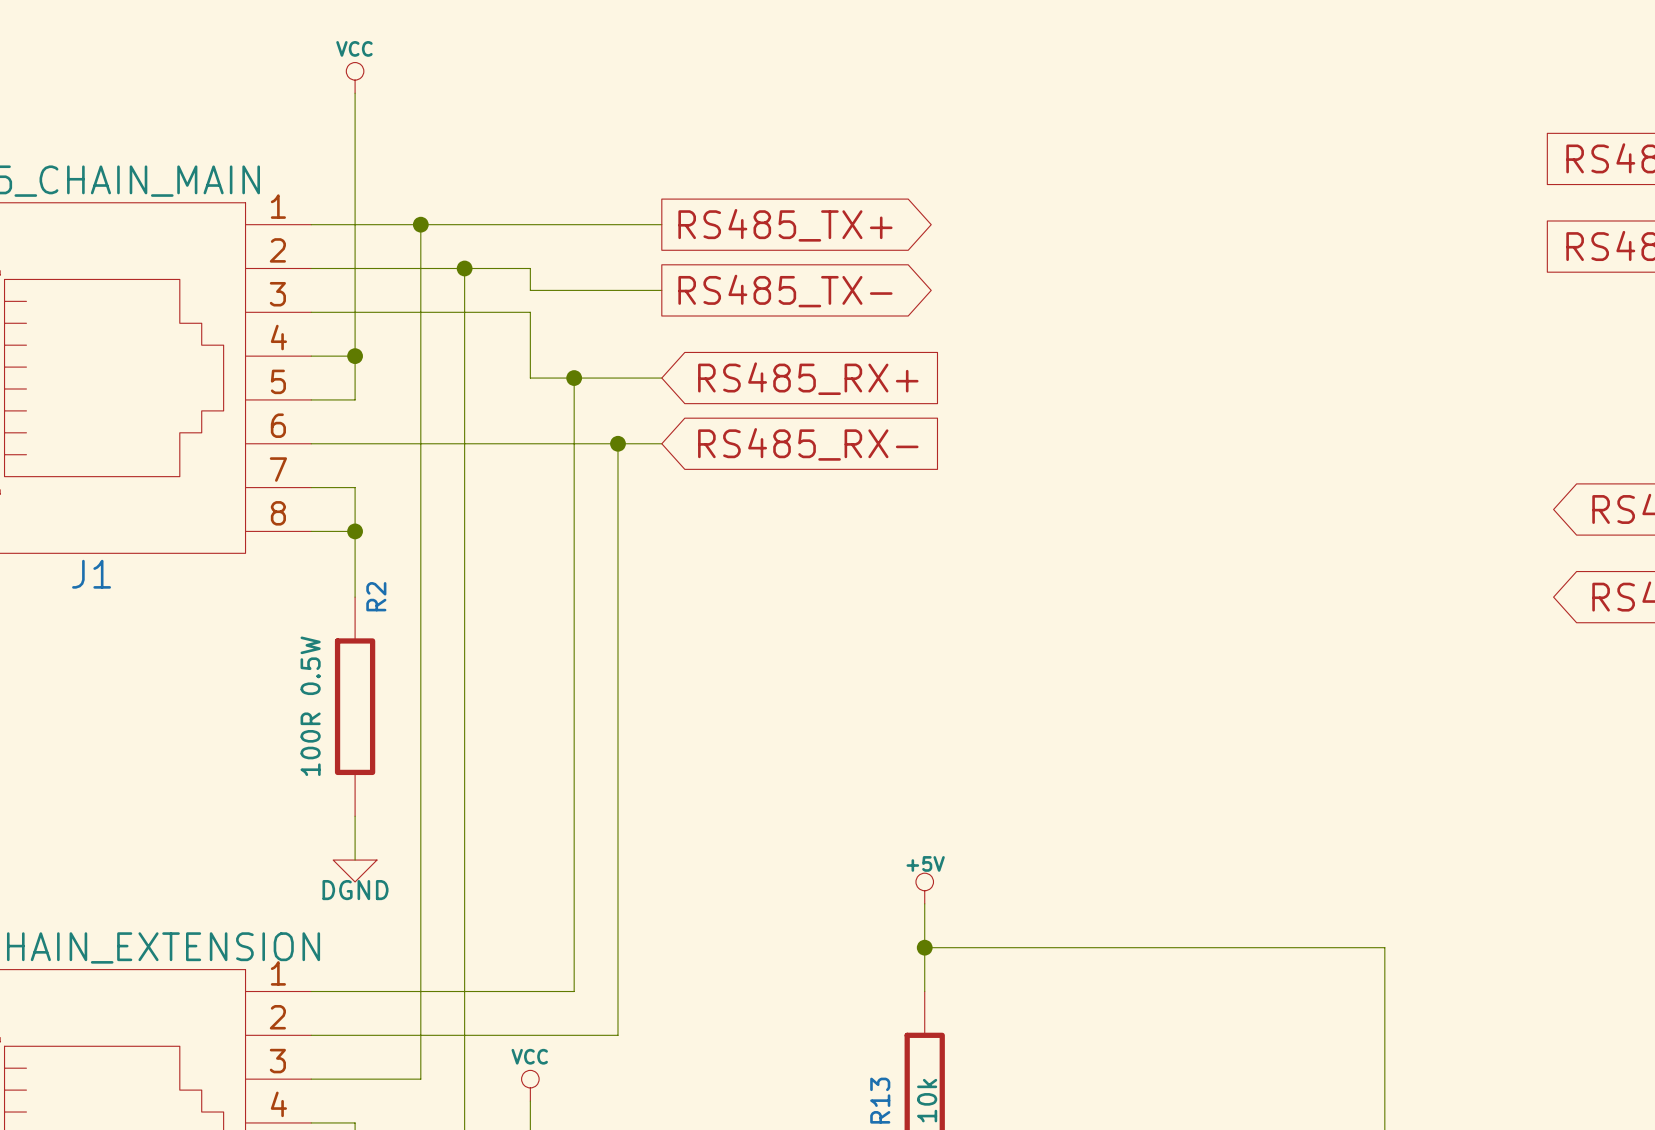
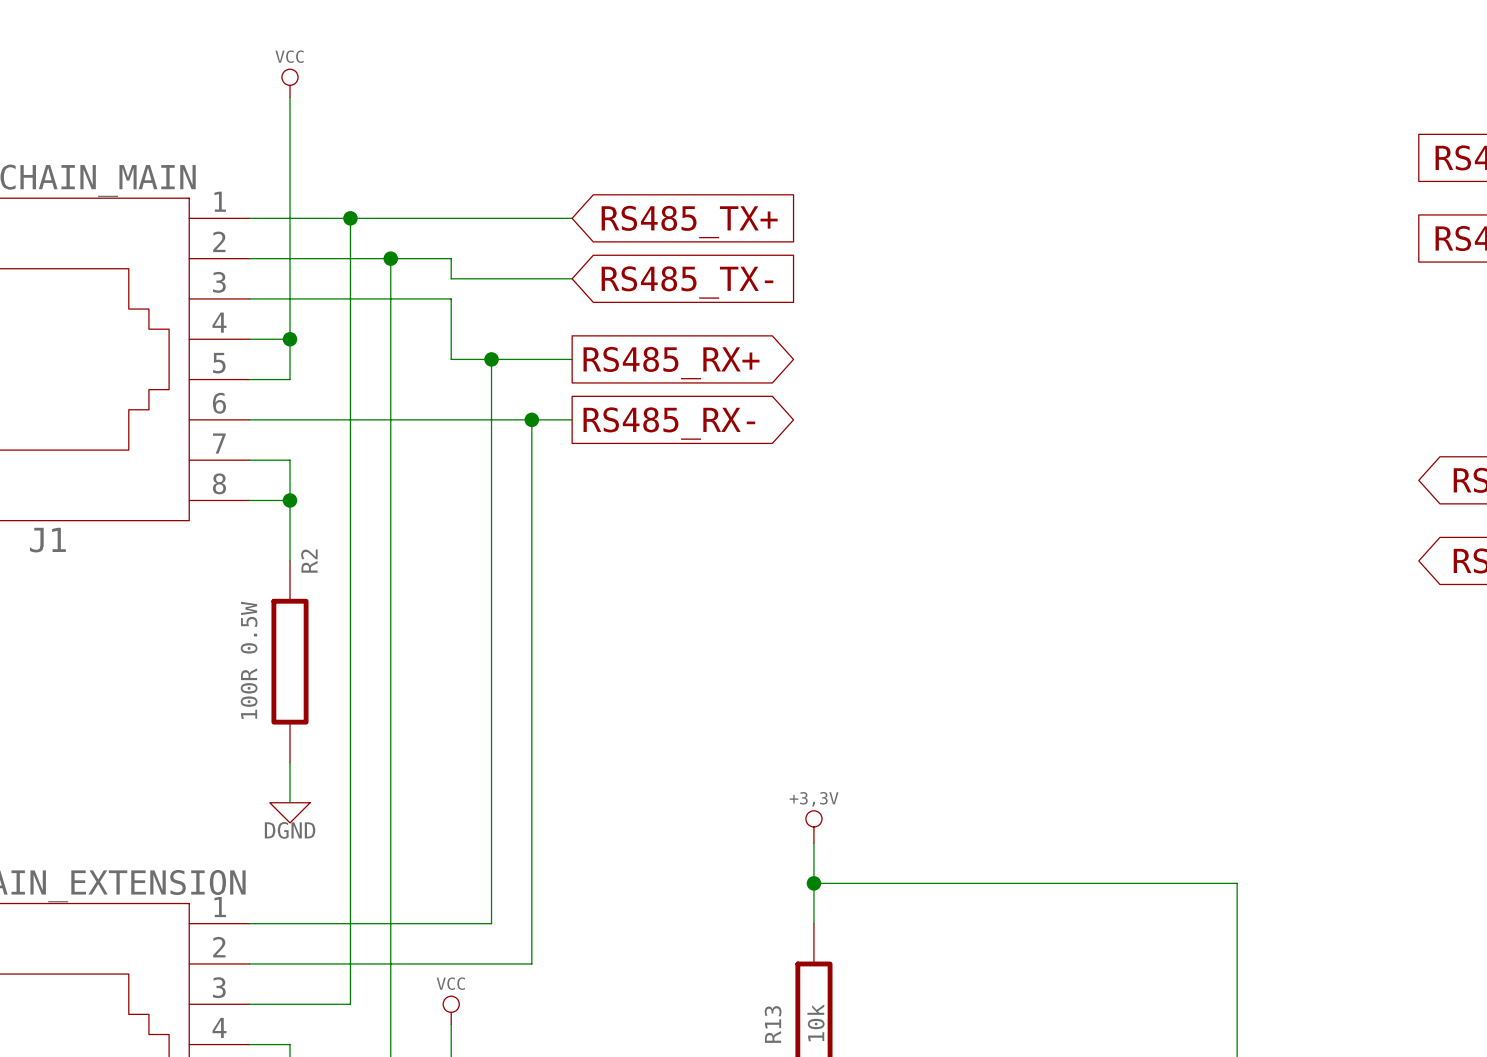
global label shape: output (785, 225) -> input (689, 222)
global label shape: output (785, 291) -> input (687, 282)
global label shape: input (808, 378) -> output (671, 363)
global label shape: input (808, 444) -> output (669, 423)
power symbol: +5V (924, 888) -> +3,3V (813, 826)

